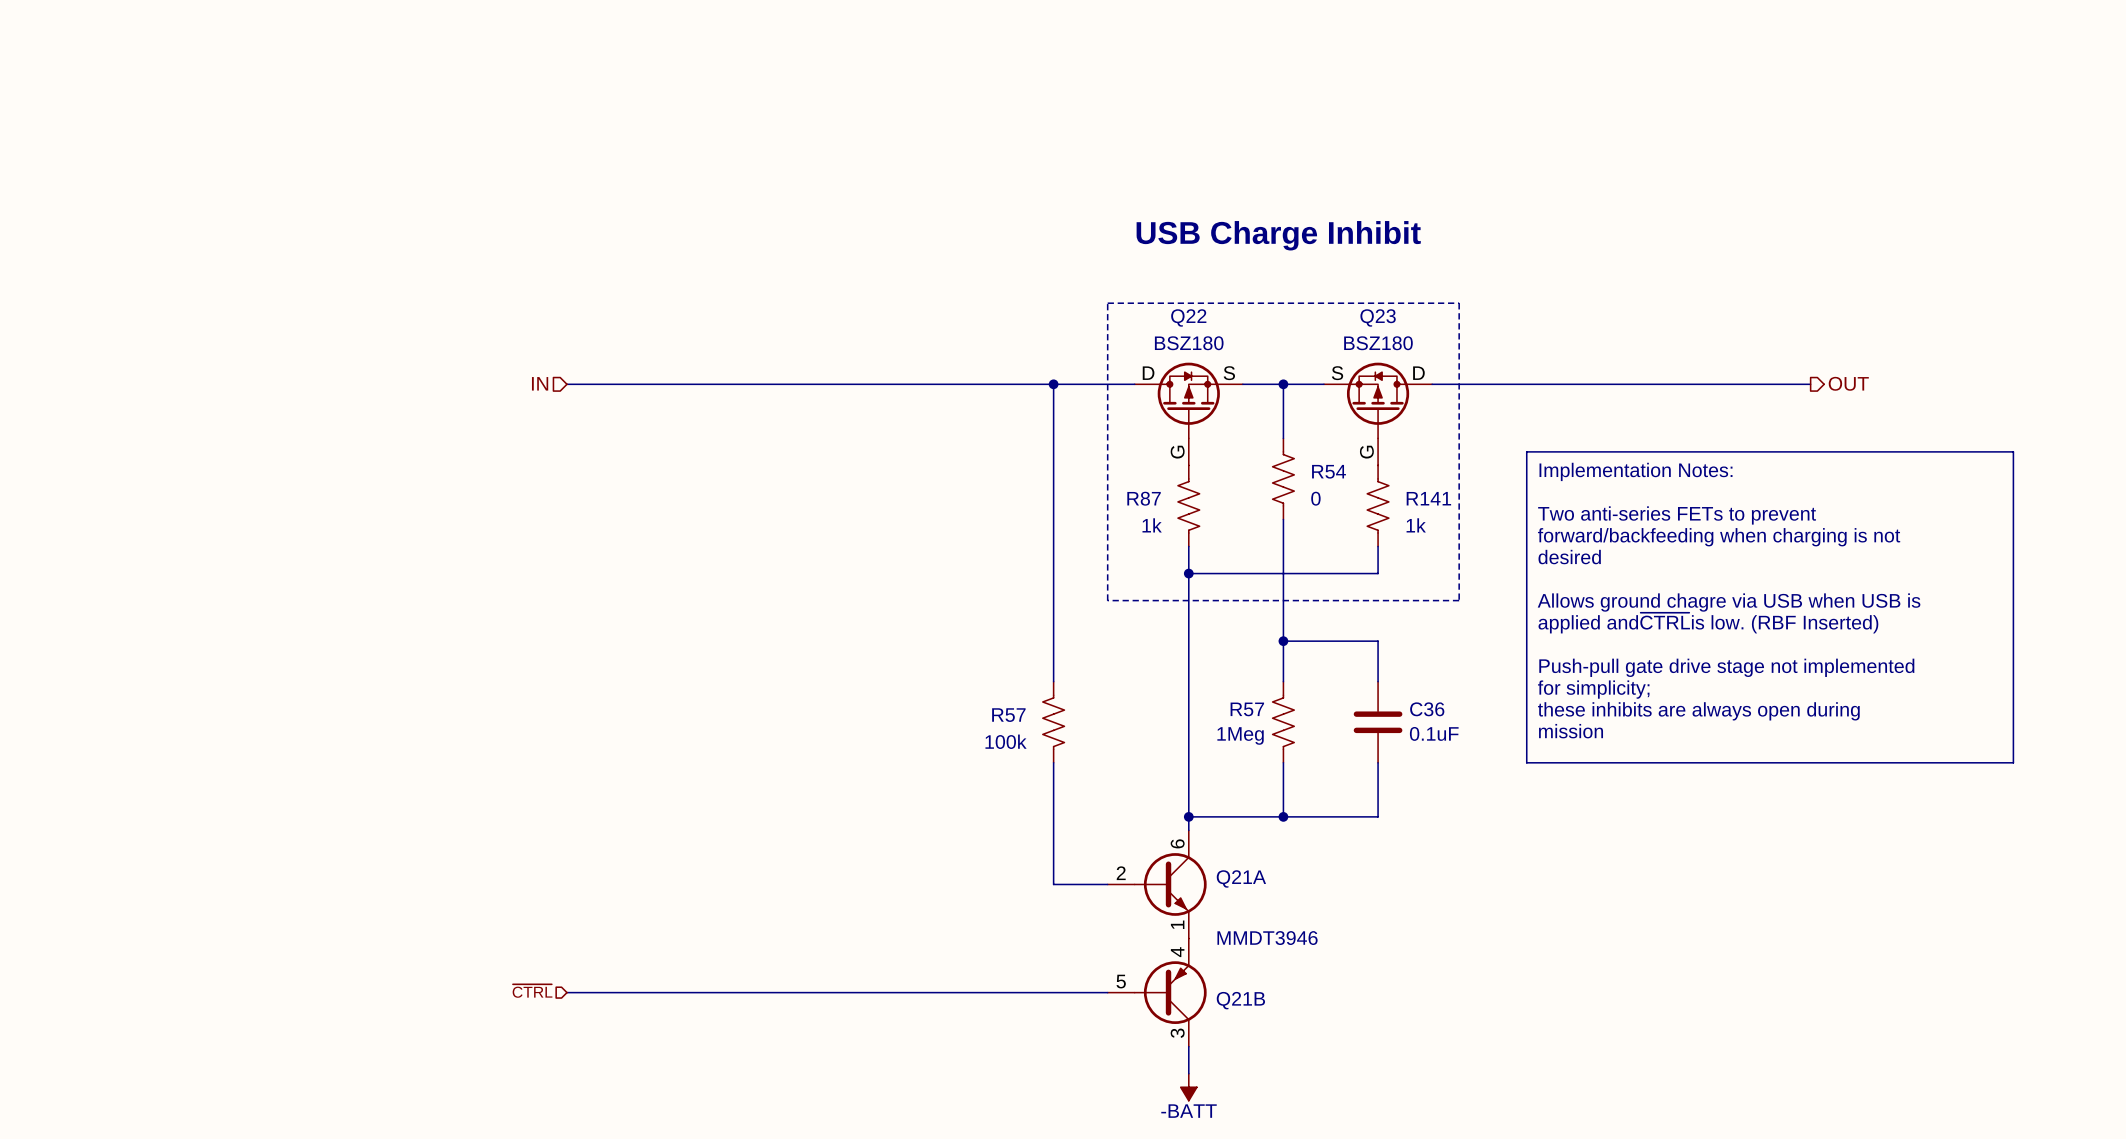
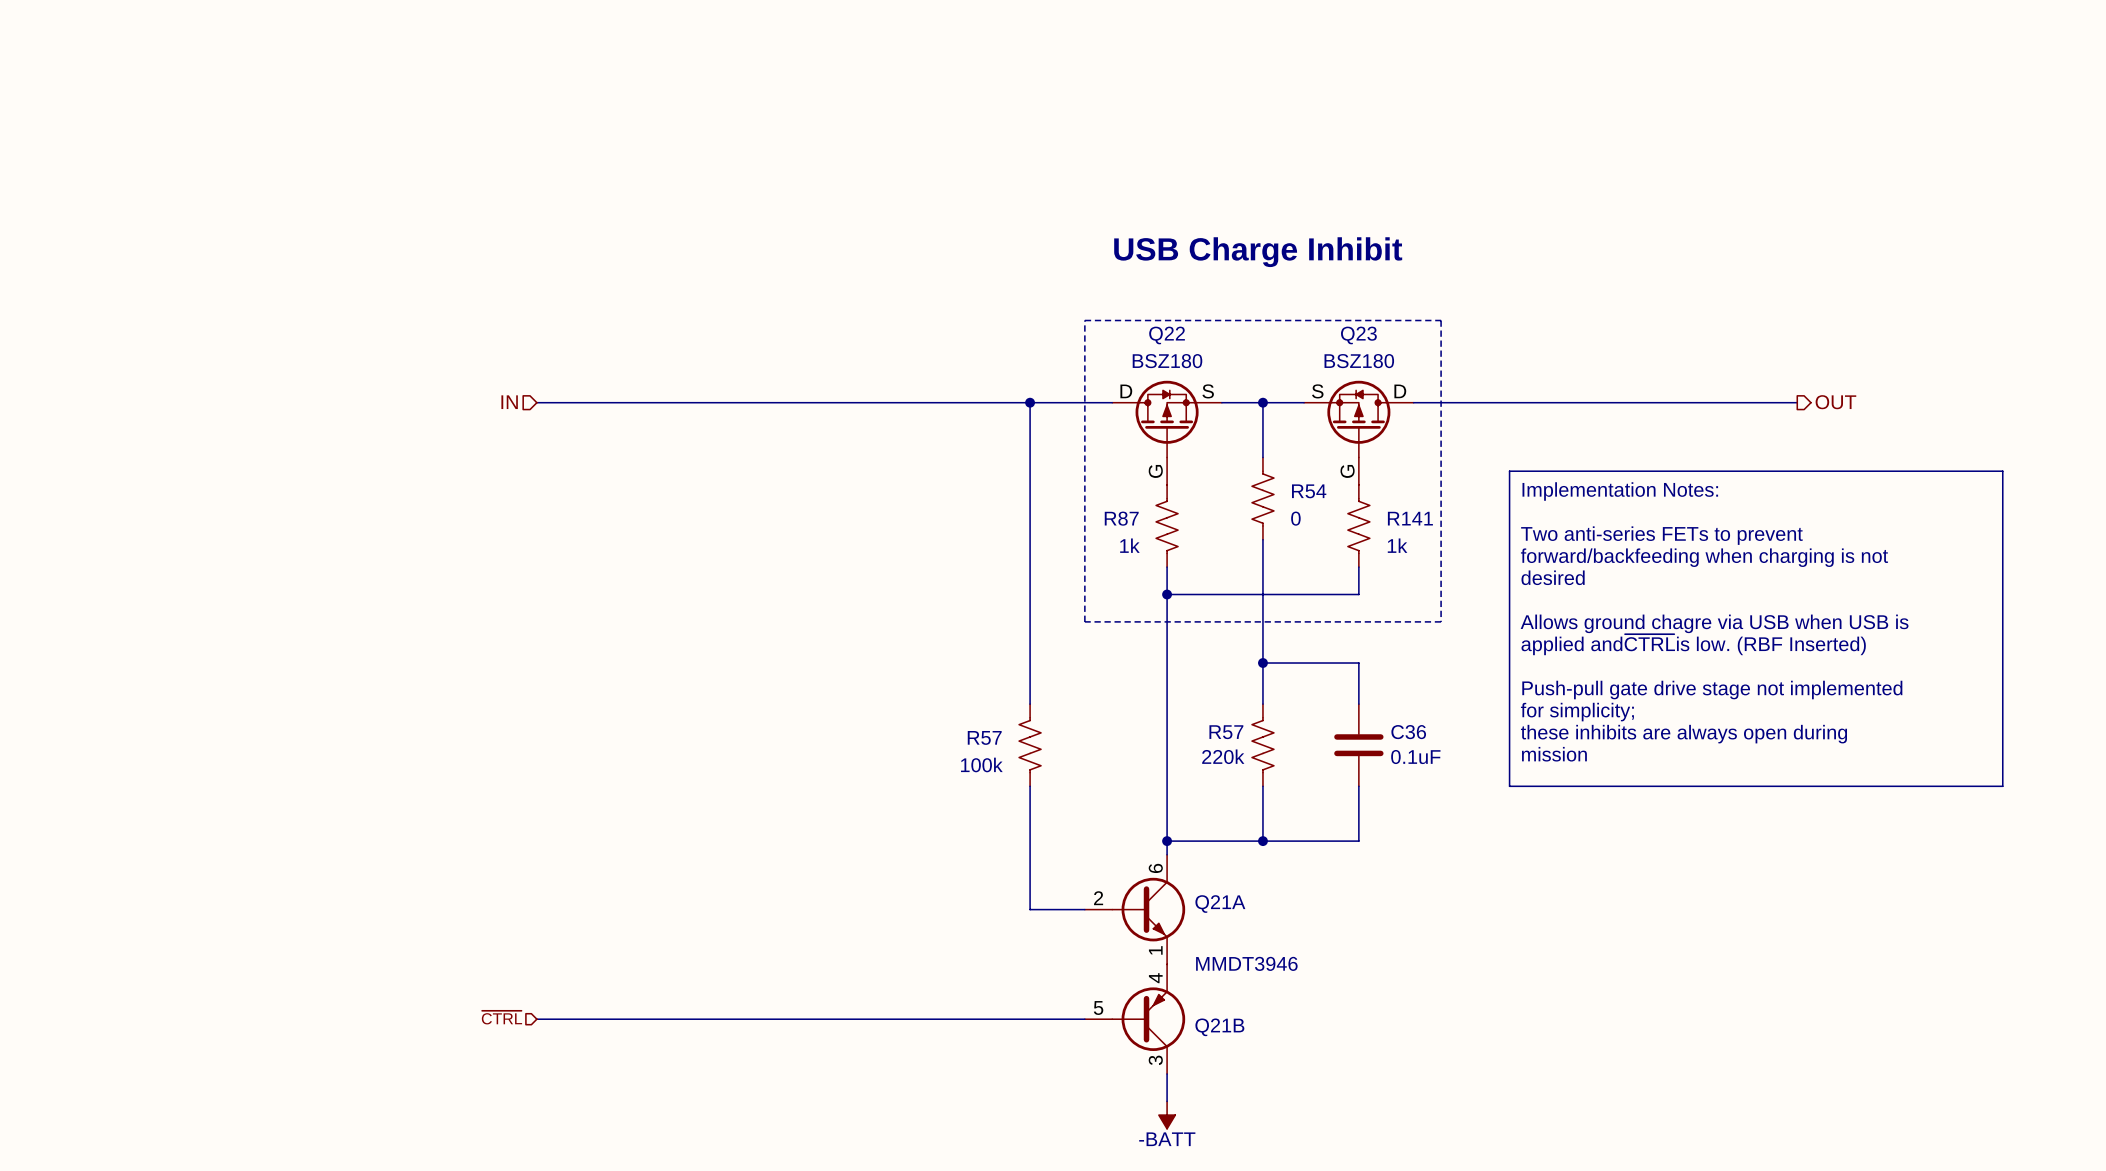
R57 value: 1Meg (1240, 735) -> 220k (1223, 756)

